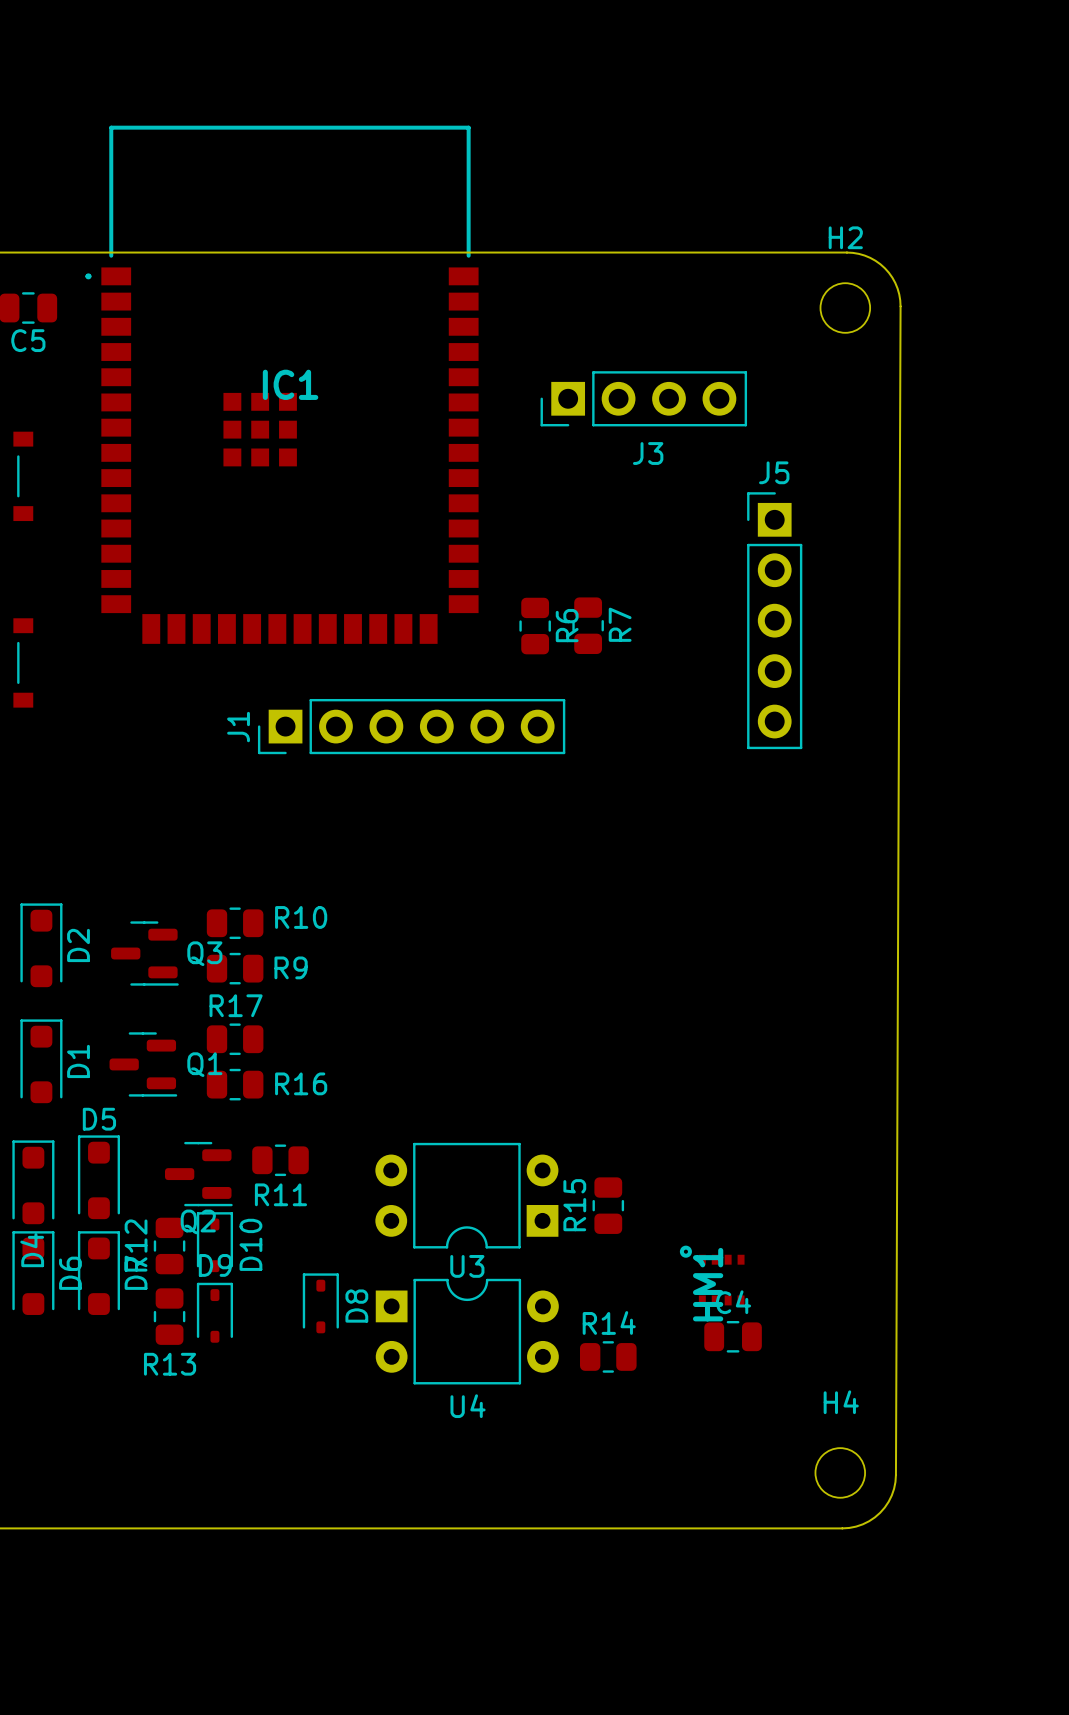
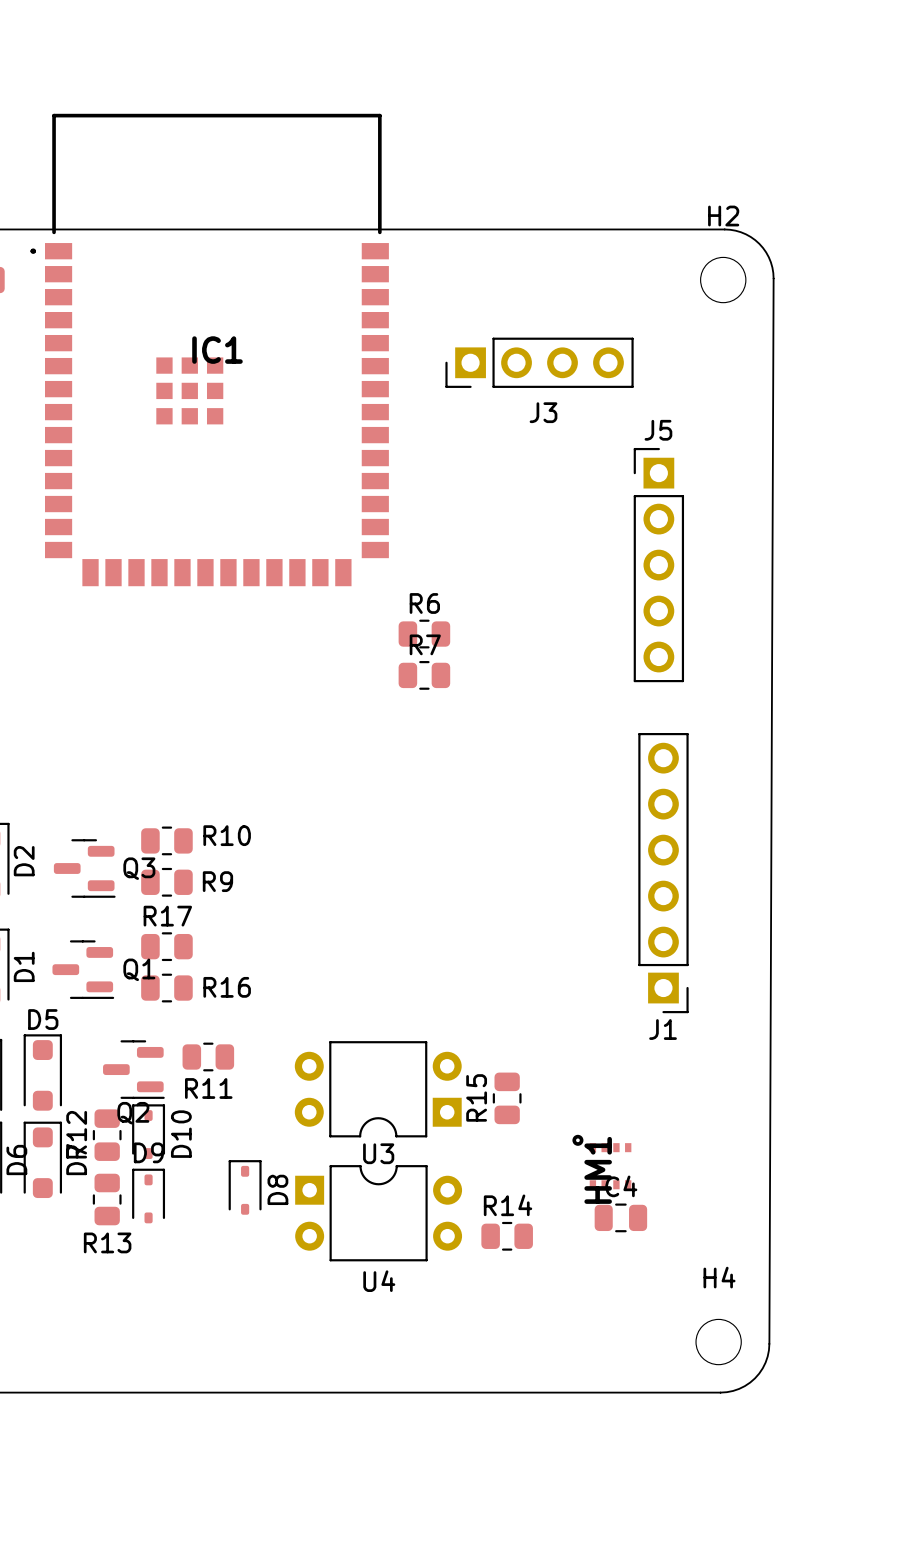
R7 name position: R7 (620, 624) -> R7 (425, 644)
R6 name position: R6 (567, 625) -> R6 (424, 603)
R7 rotation: 0° (588, 625) -> 90° clockwise (424, 675)
R7 position: (588, 625) -> (424, 675)
R6 rotation: 0° (535, 626) -> 90° clockwise (424, 634)
R6 position: (535, 626) -> (424, 634)
J1 rotation: 0° (411, 726) -> 90° counterclockwise (663, 873)
J1 position: (411, 726) -> (663, 873)

